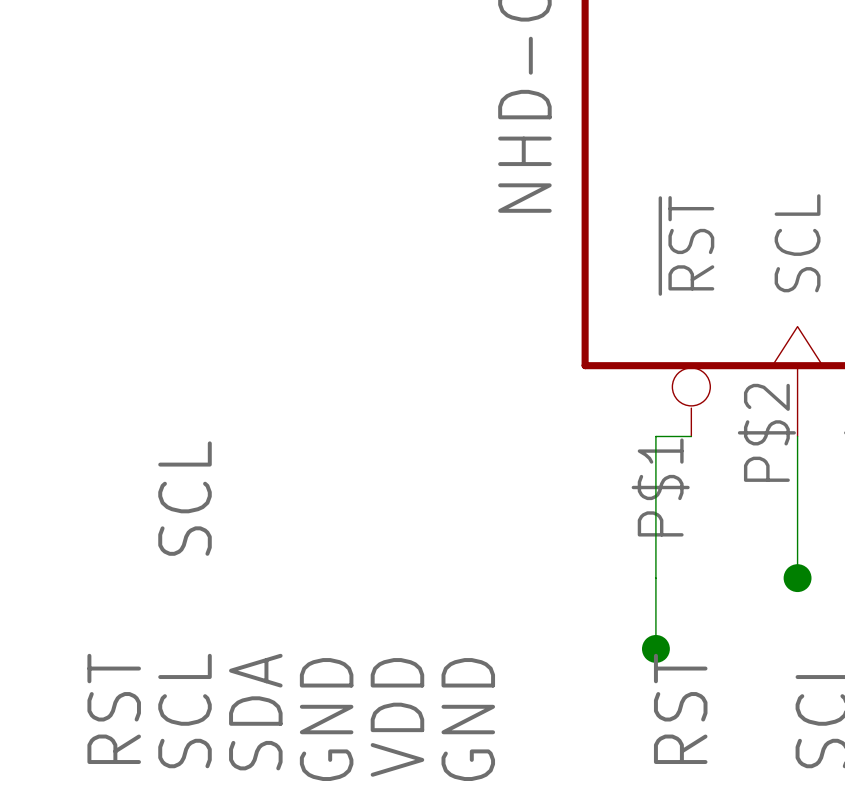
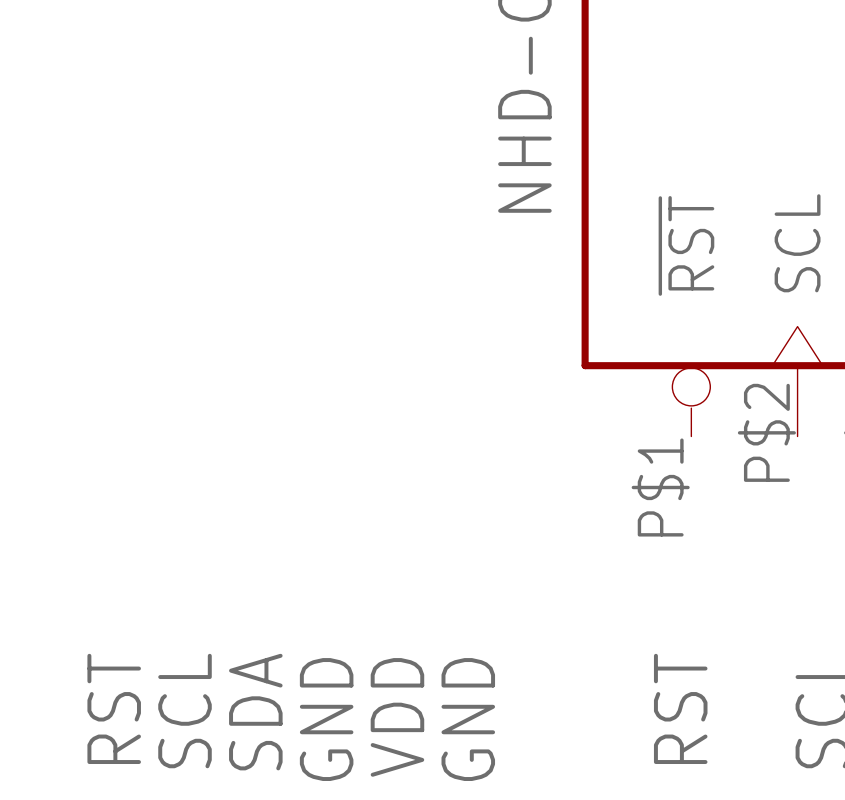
wire: (691, 436) (655, 436) (655, 648) -> none
wire: (797, 436) (797, 578) -> none
label: SCL (185, 498) -> none
junction: (797, 578) -> none
junction: (655, 648) -> none

